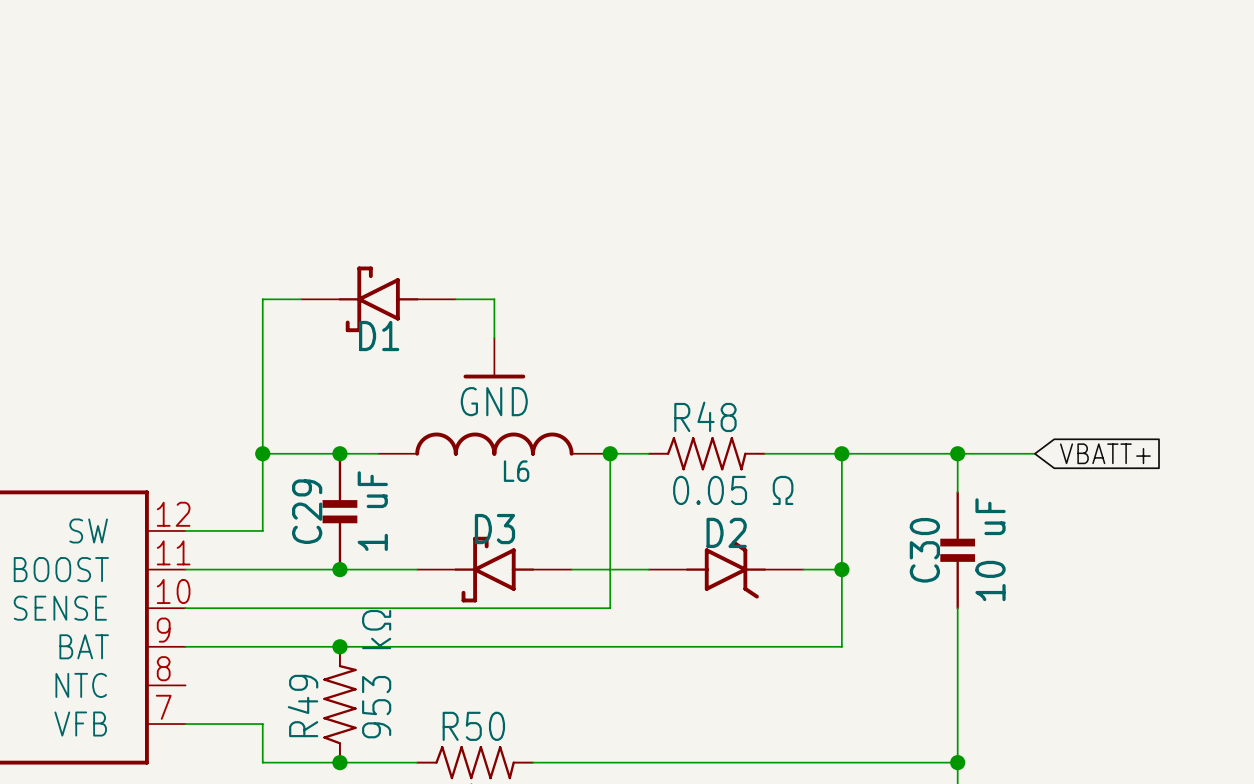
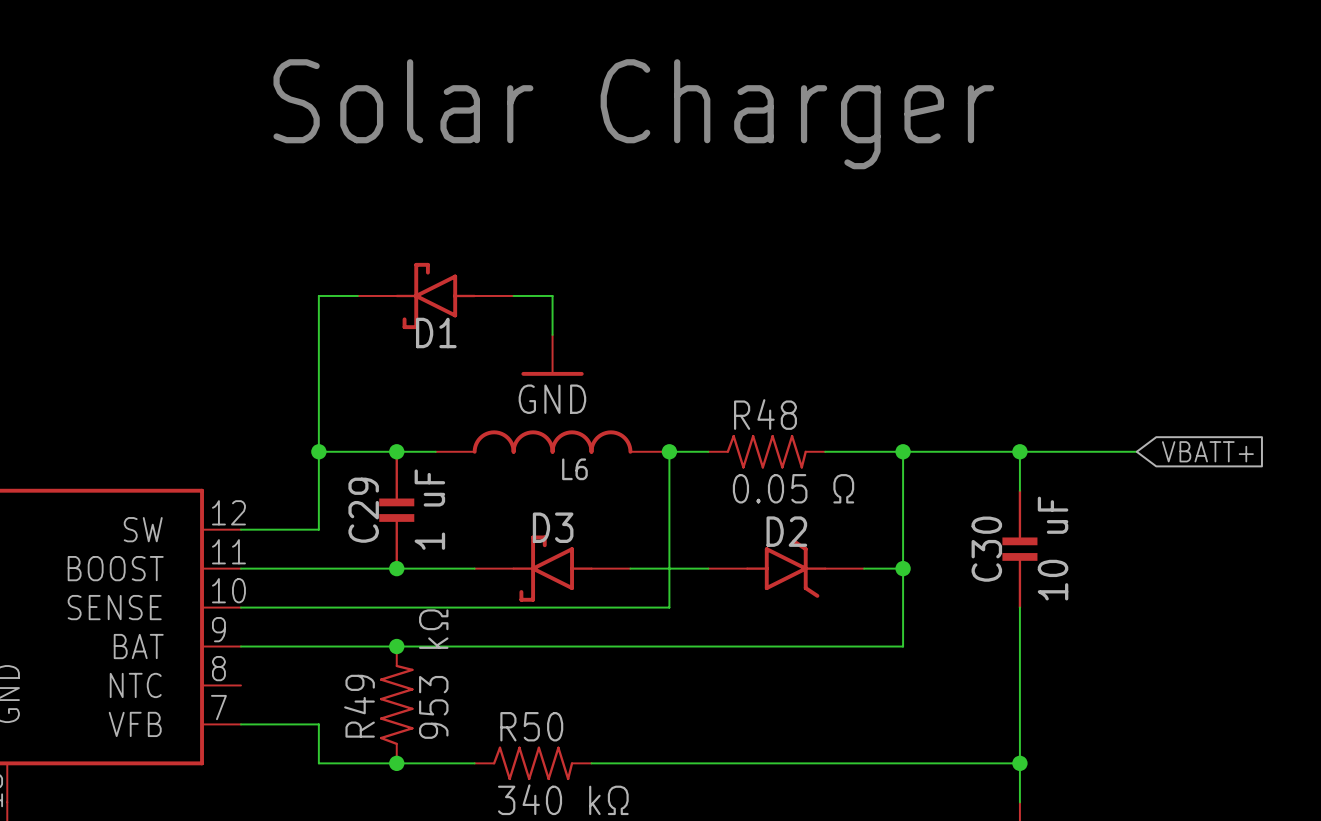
text: none -> Solar Charger (633, 114)
wire: none -> (1097, 451) (1136, 451)
global label position: VBATT+ (1105, 453) -> VBATT+ (1207, 451)

